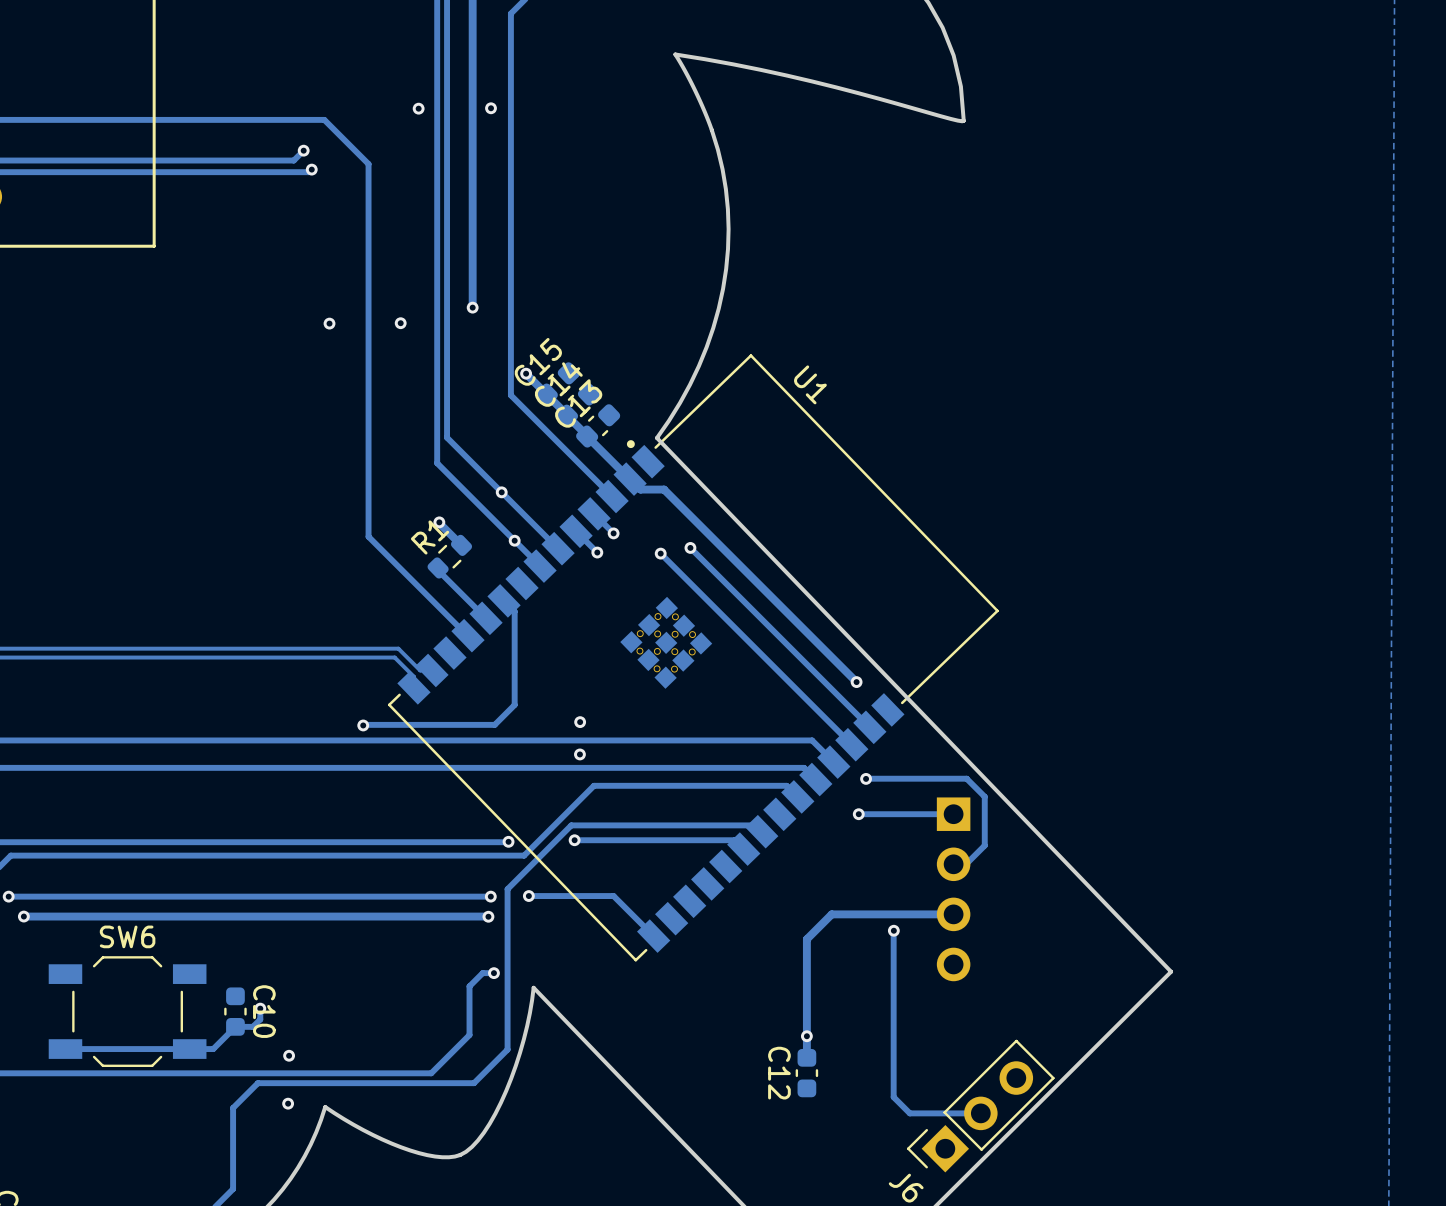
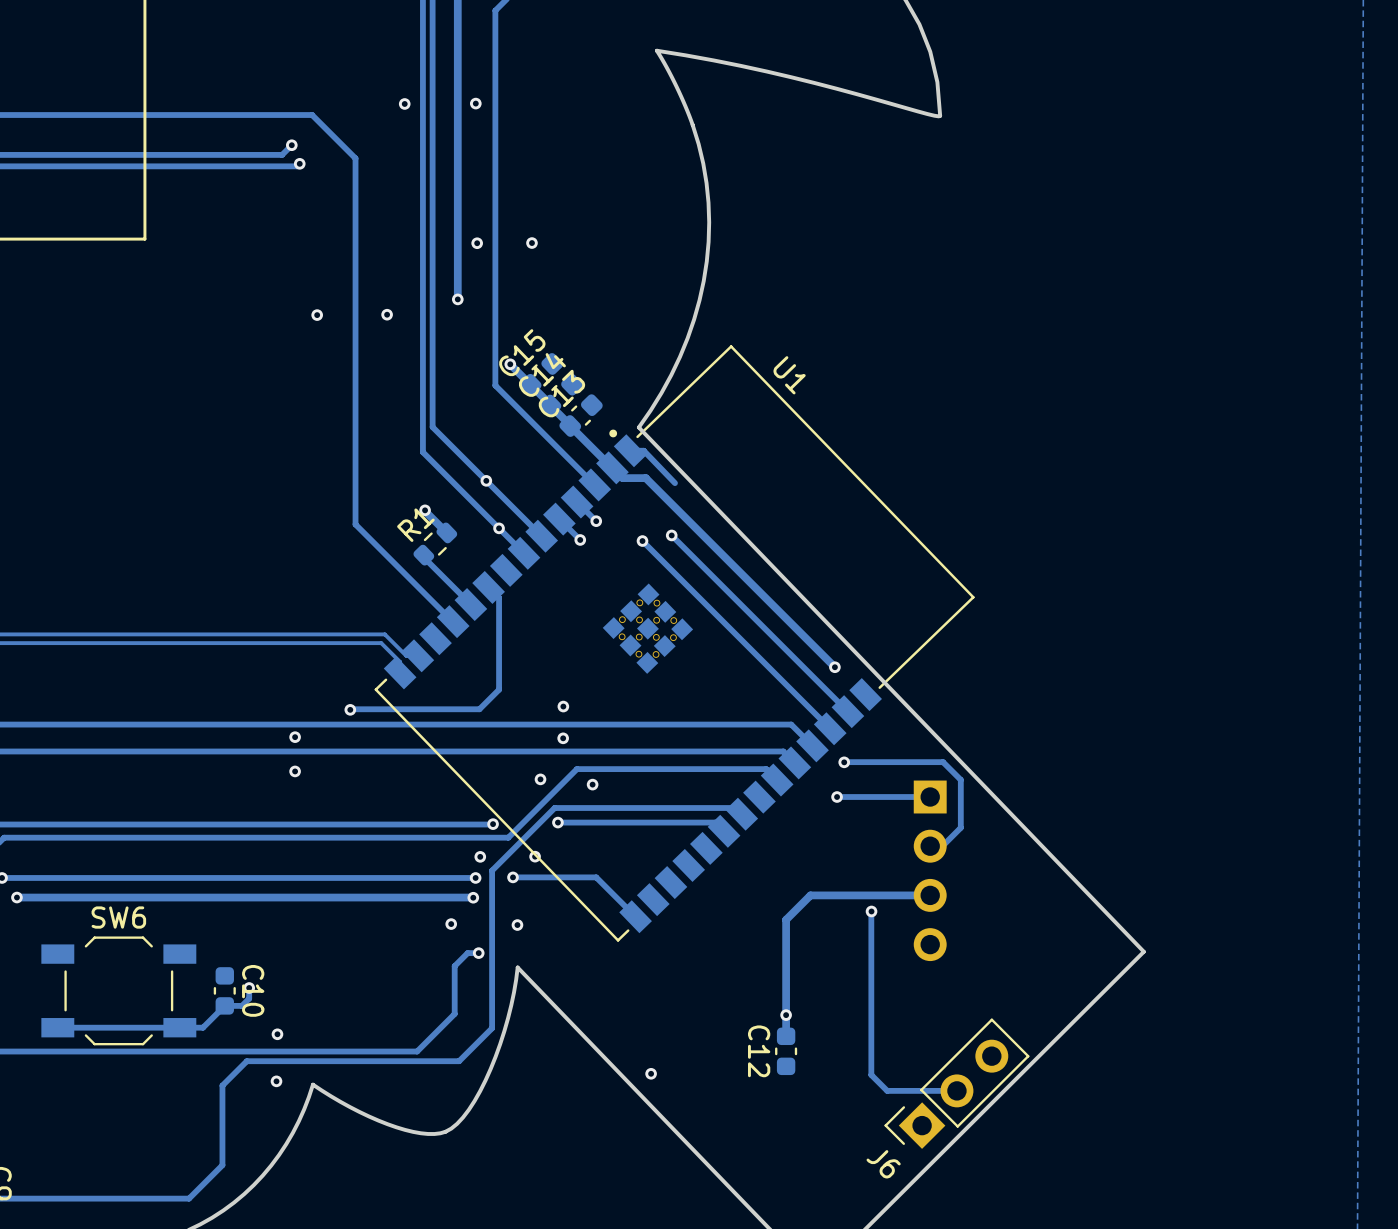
via: none -> (477, 243)
via: none -> (531, 243)
track: none -> (630, 450) (643, 450) (674, 483)
via: none -> (295, 737)
via: none -> (295, 771)
via: none -> (540, 779)
via: none -> (592, 784)
via: none -> (535, 856)
via: none -> (480, 856)
via: none -> (451, 924)
via: none -> (517, 925)
via: none -> (651, 1073)

